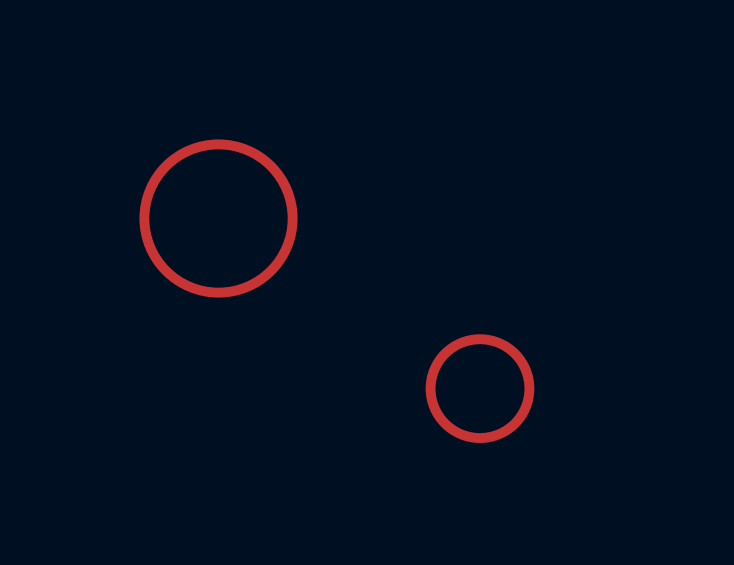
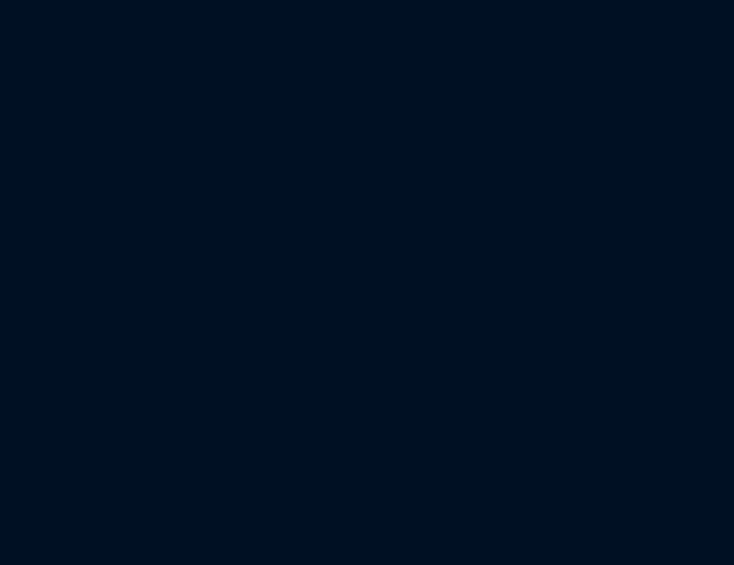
drawing: [139, 139, 298, 298] -> none
drawing: [425, 334, 535, 443] -> none

